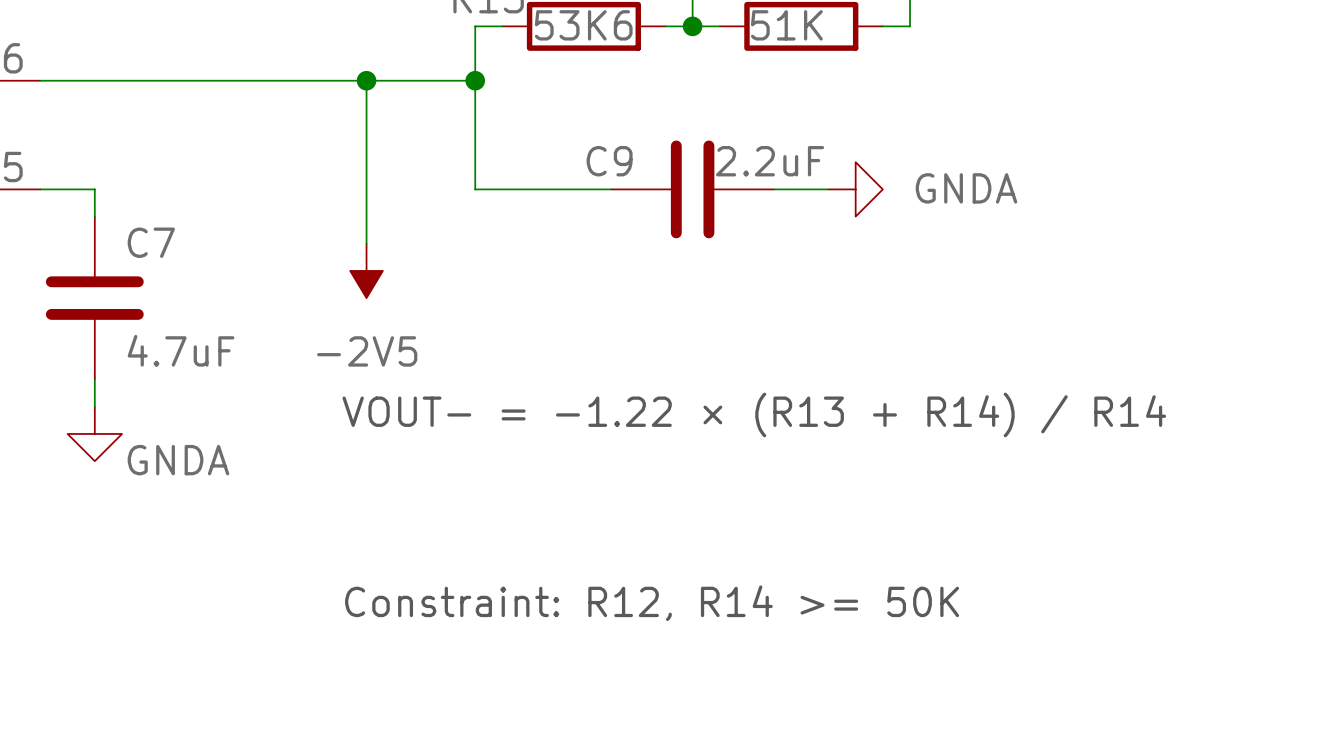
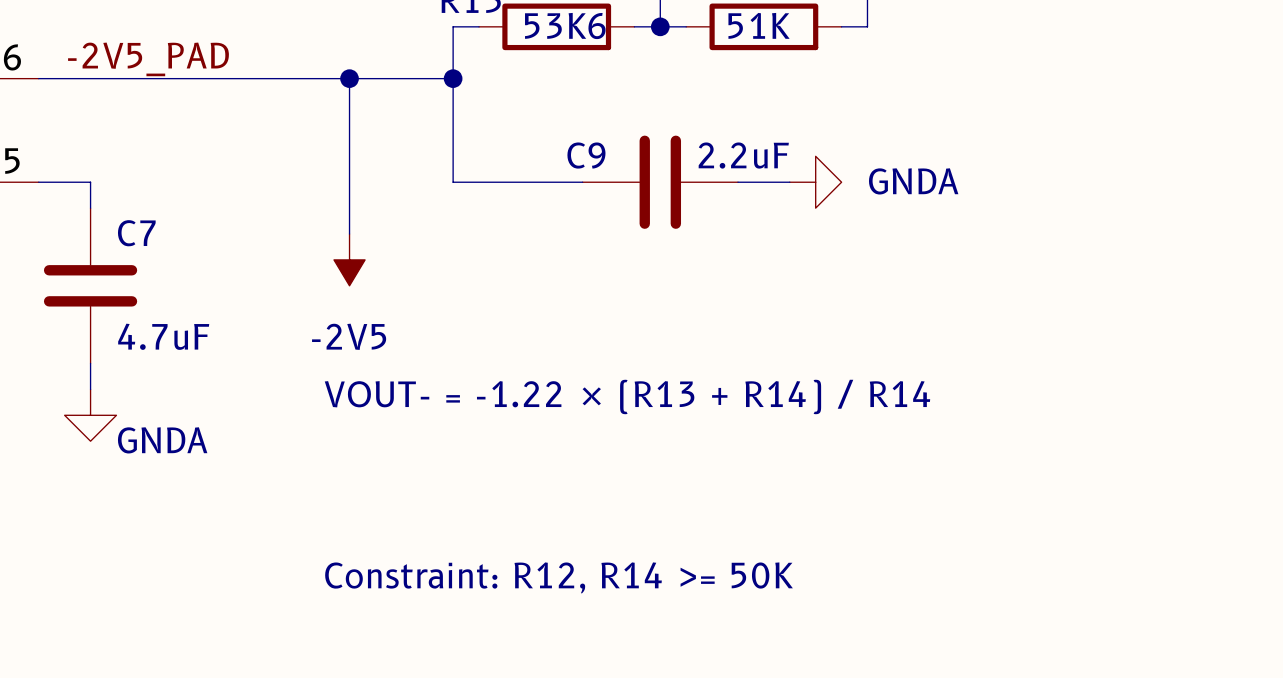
label: none -> -2V5_PAD (148, 59)

